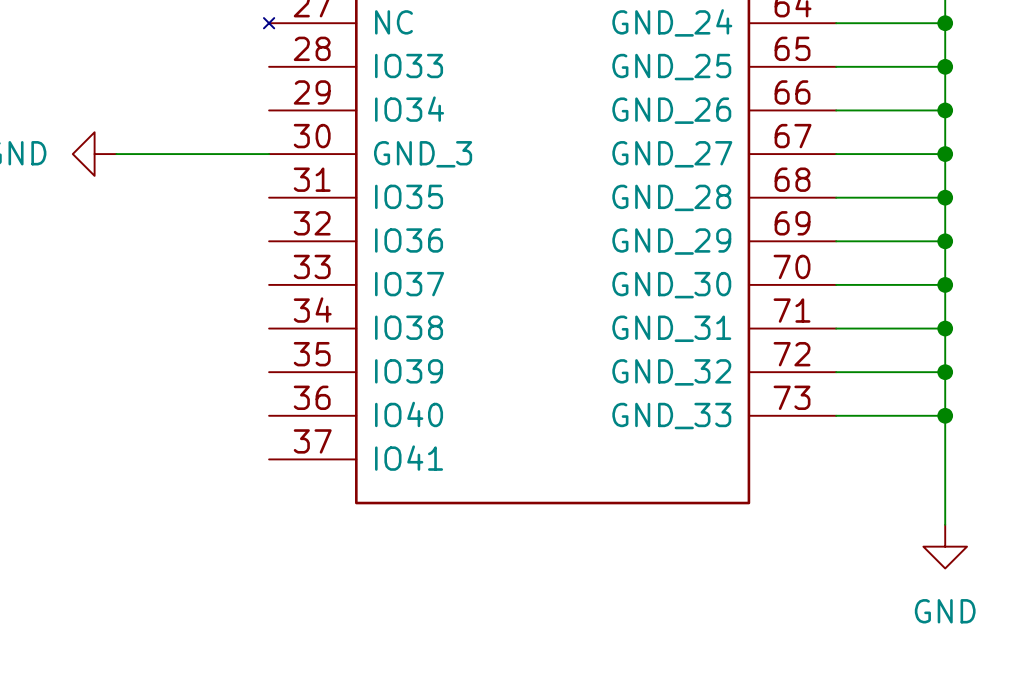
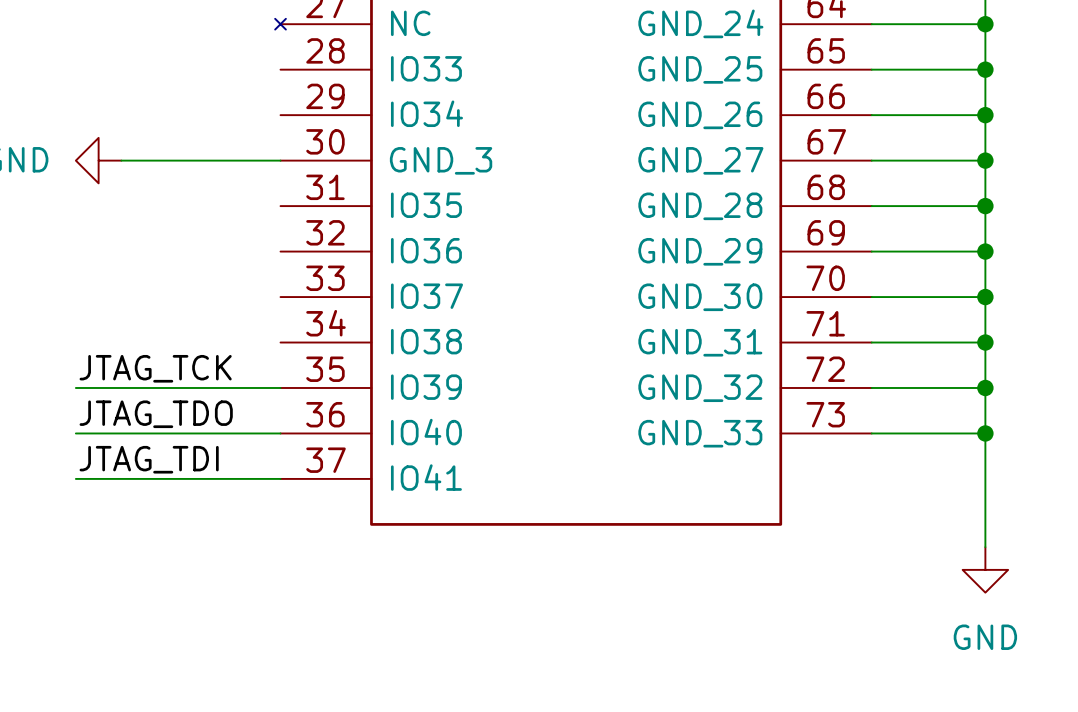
label: none -> JTAG_TCK (155, 368)
wire: none -> (75, 387) (280, 387)
label: none -> JTAG_TDO (156, 414)
wire: none -> (75, 433) (280, 433)
label: none -> JTAG_TDI (149, 459)
wire: none -> (75, 478) (280, 478)

